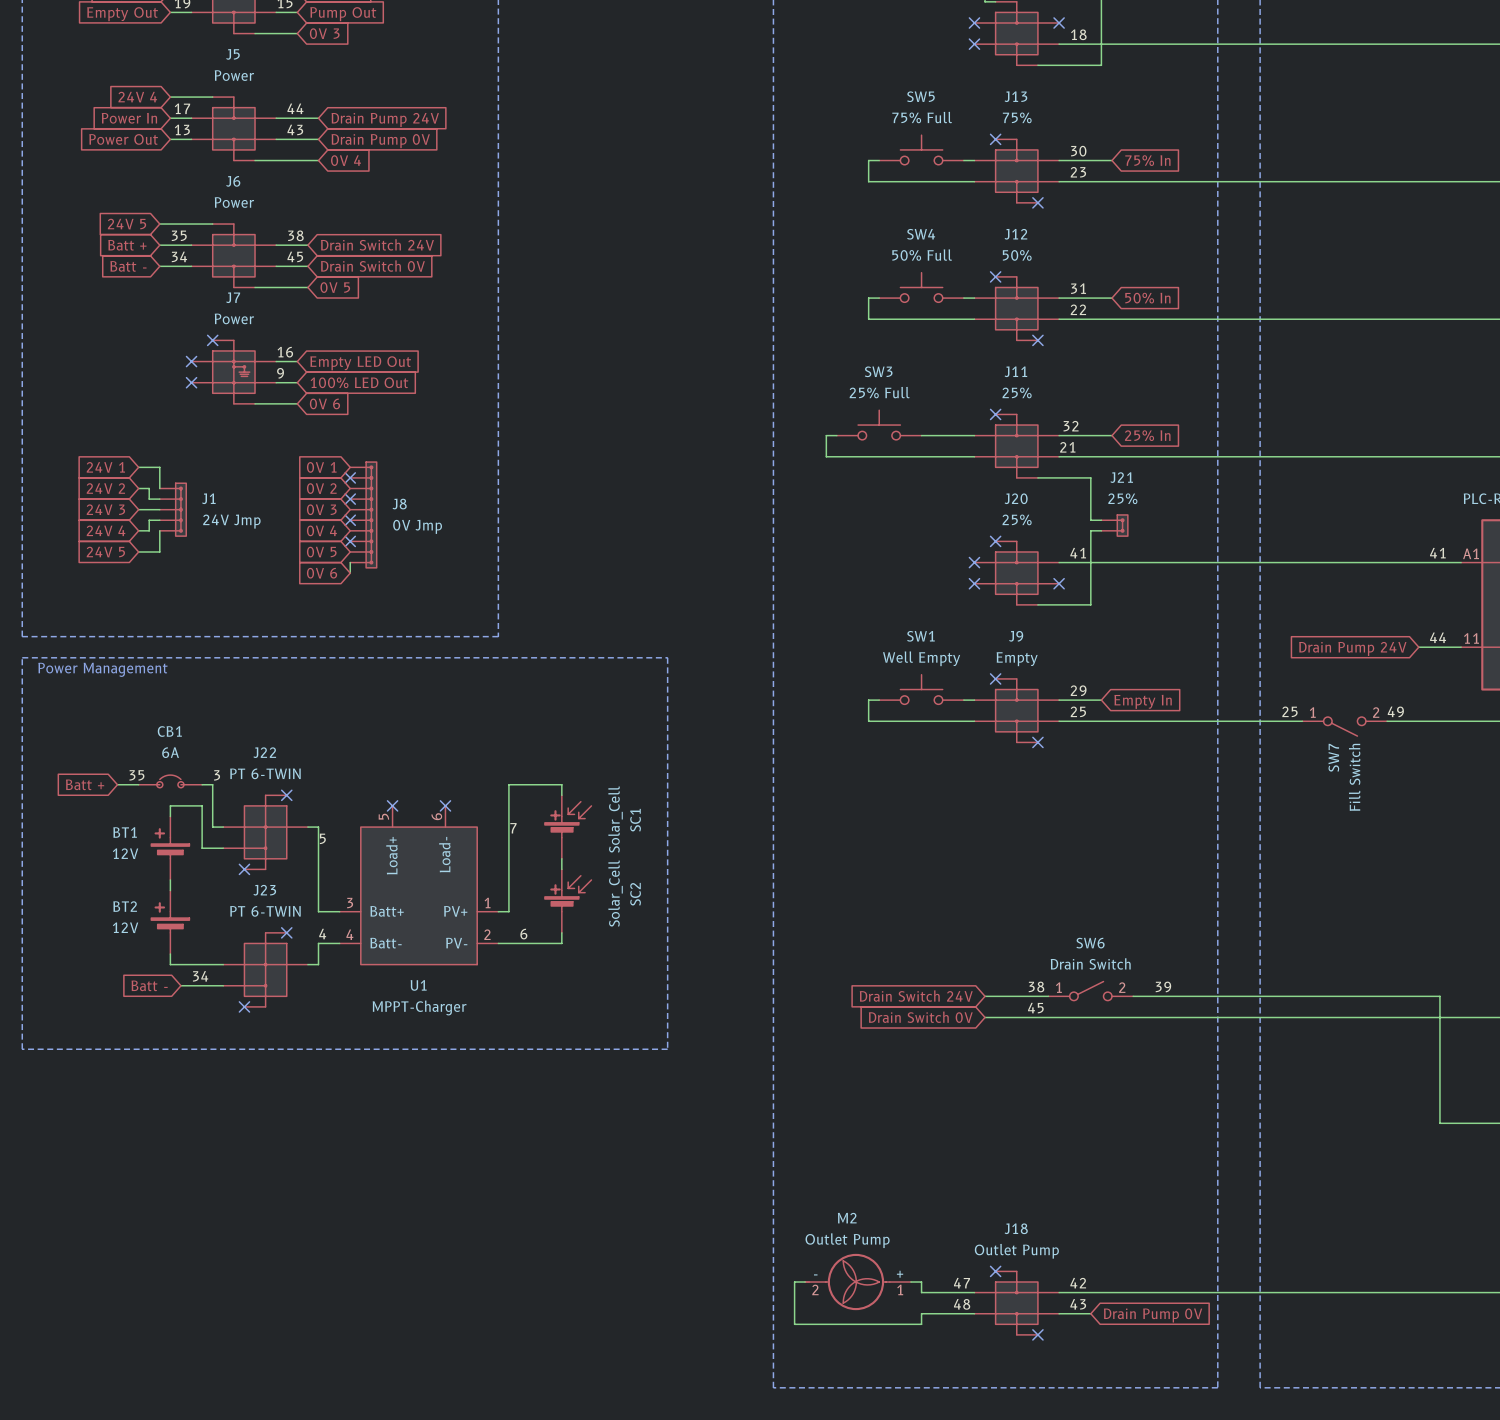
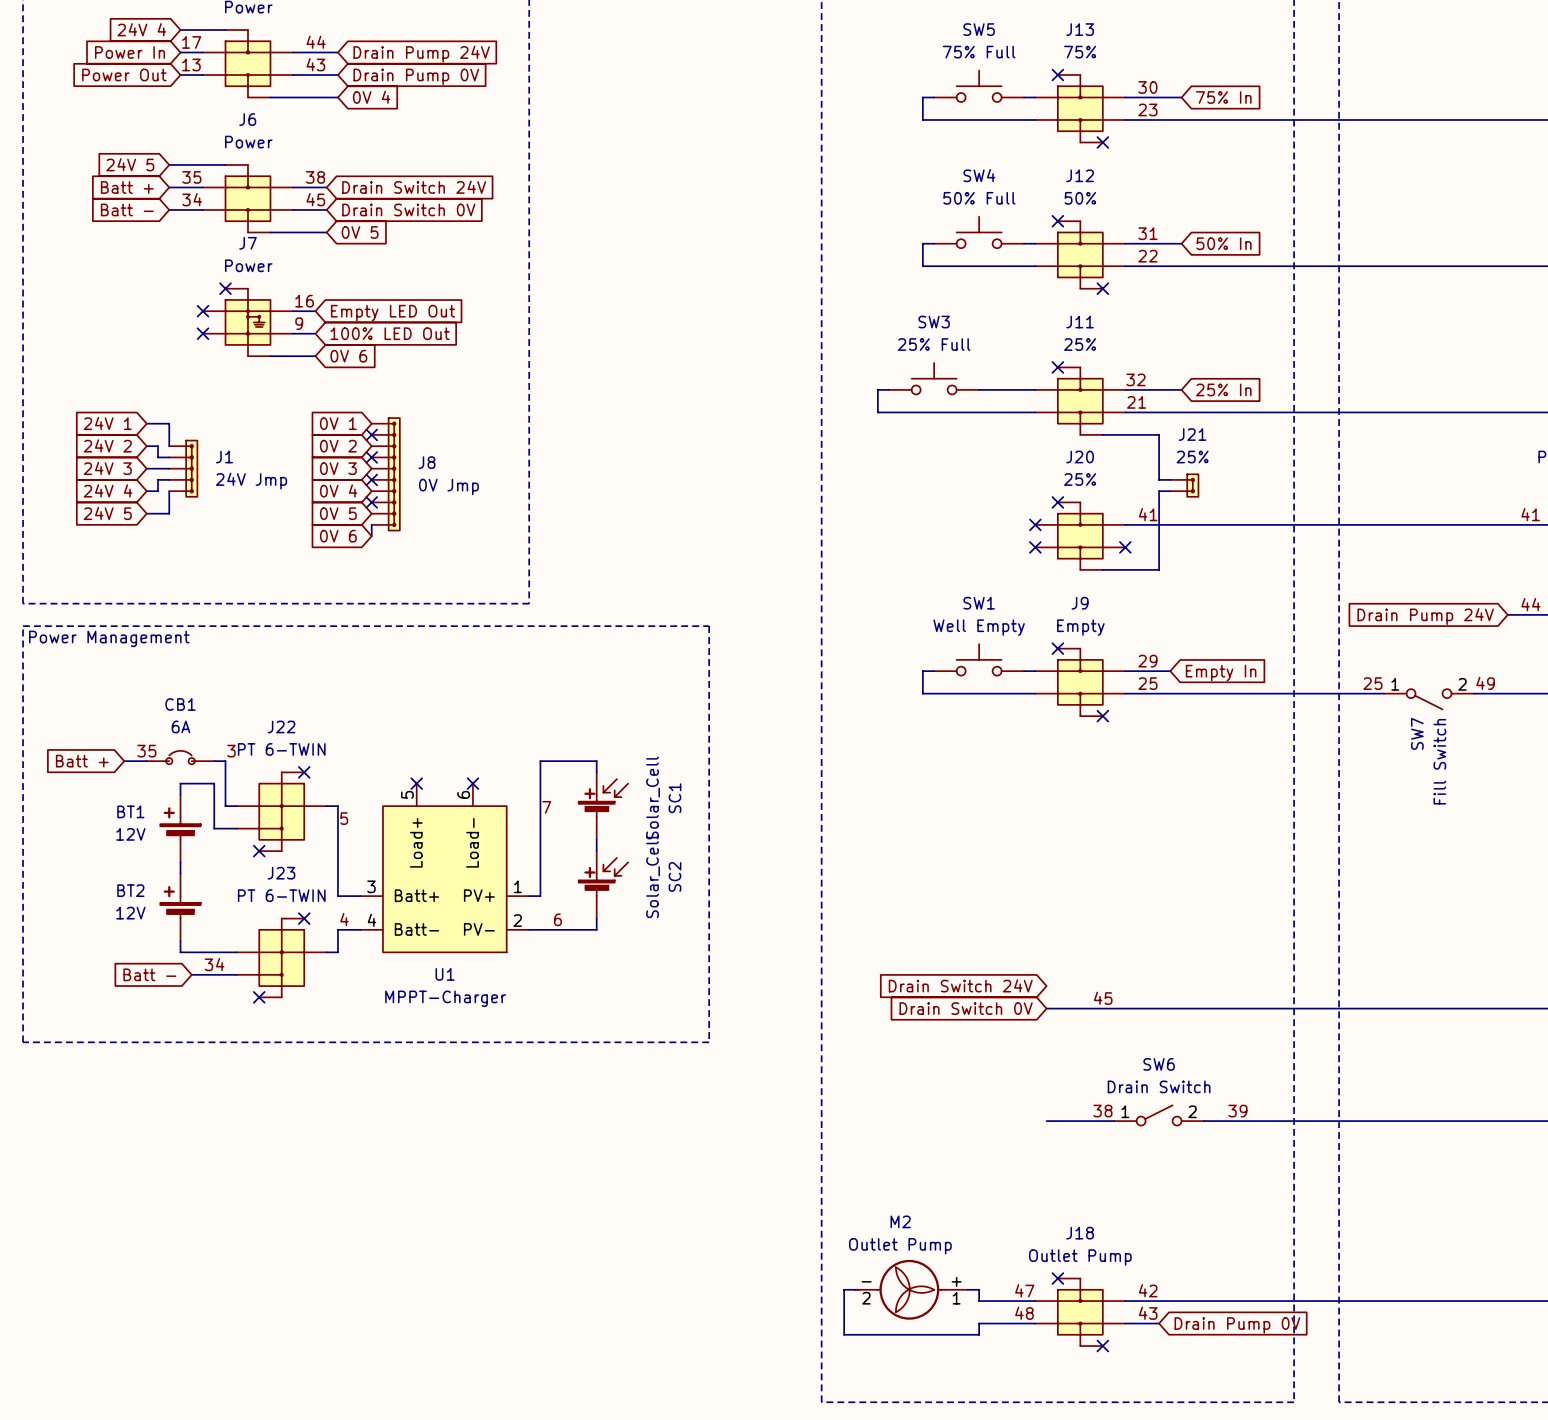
label position: 38 (1036, 986) -> 38 (1102, 1111)
label position: 39 (1163, 986) -> 39 (1237, 1111)
SW6 position: (1090, 991) -> (1159, 1115)
wire: (985, 996) (1048, 996) -> (1046, 1121) (1114, 1121)
wire: (1133, 996) (1439, 996) (1439, 1123) -> (1204, 1121) (1530, 1121)

